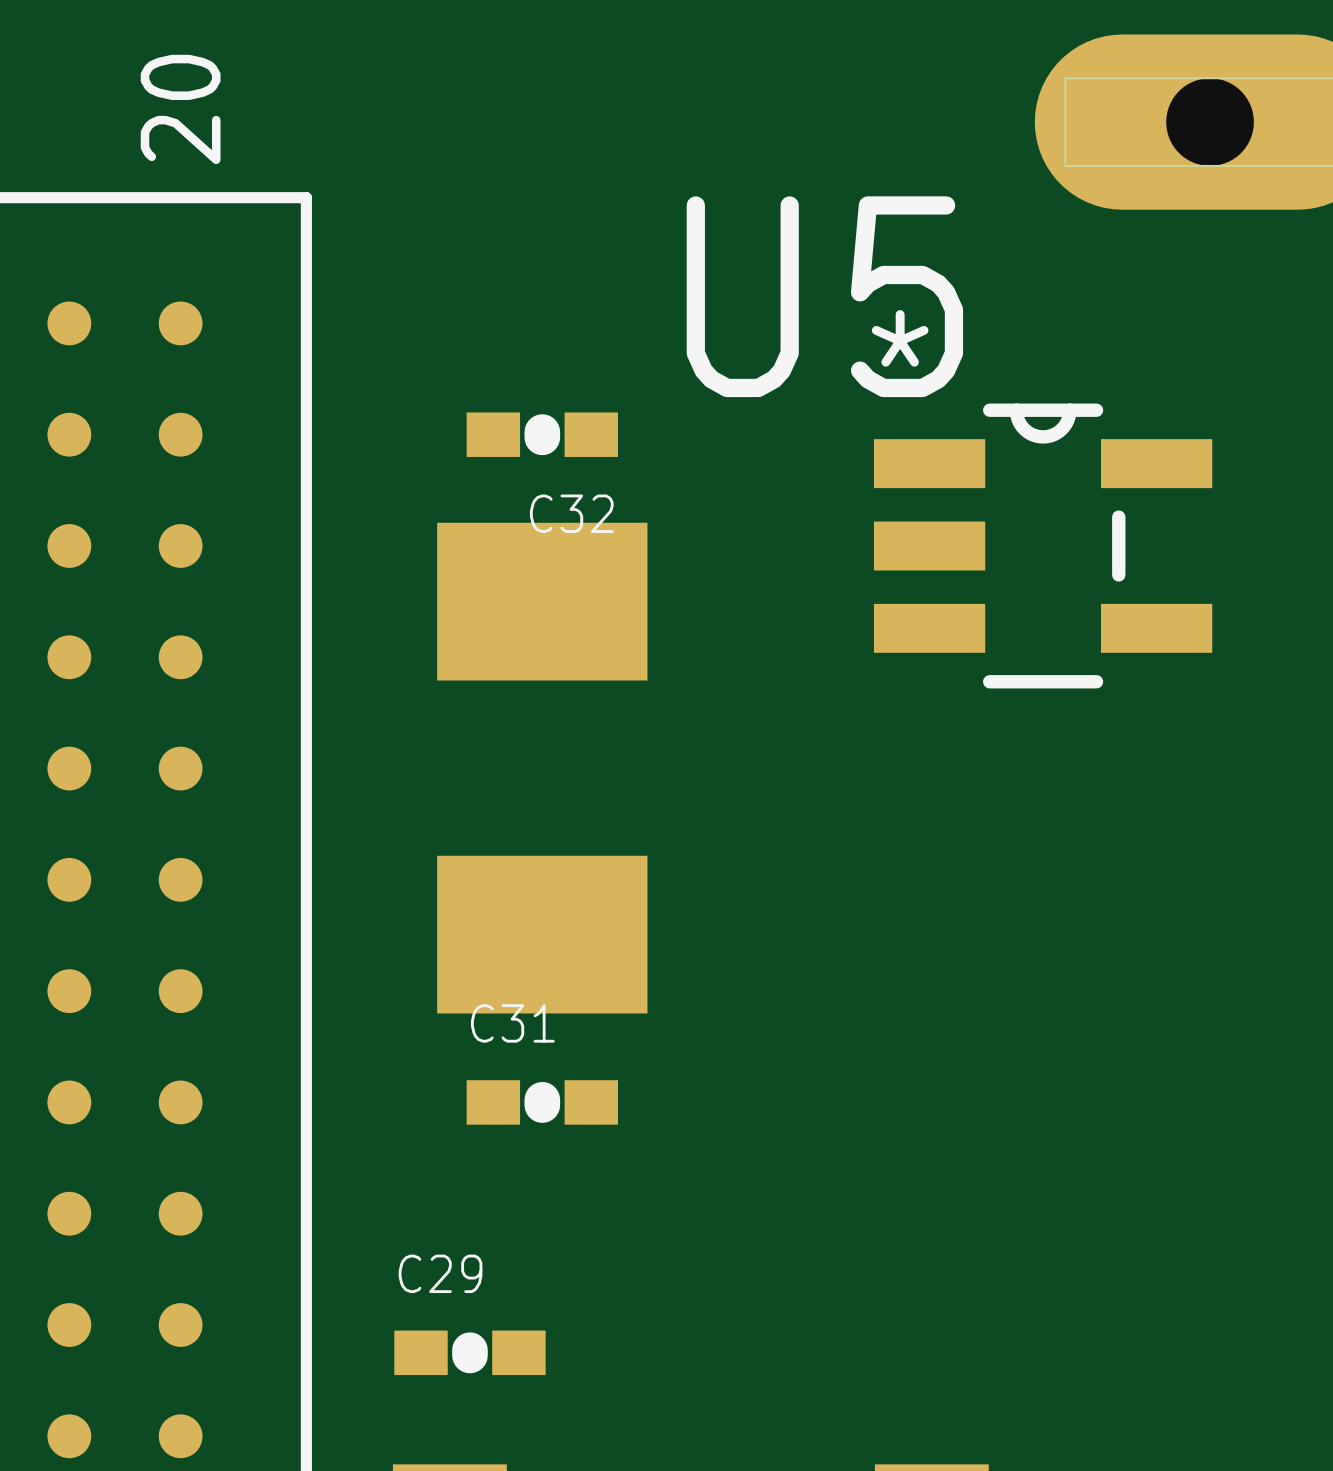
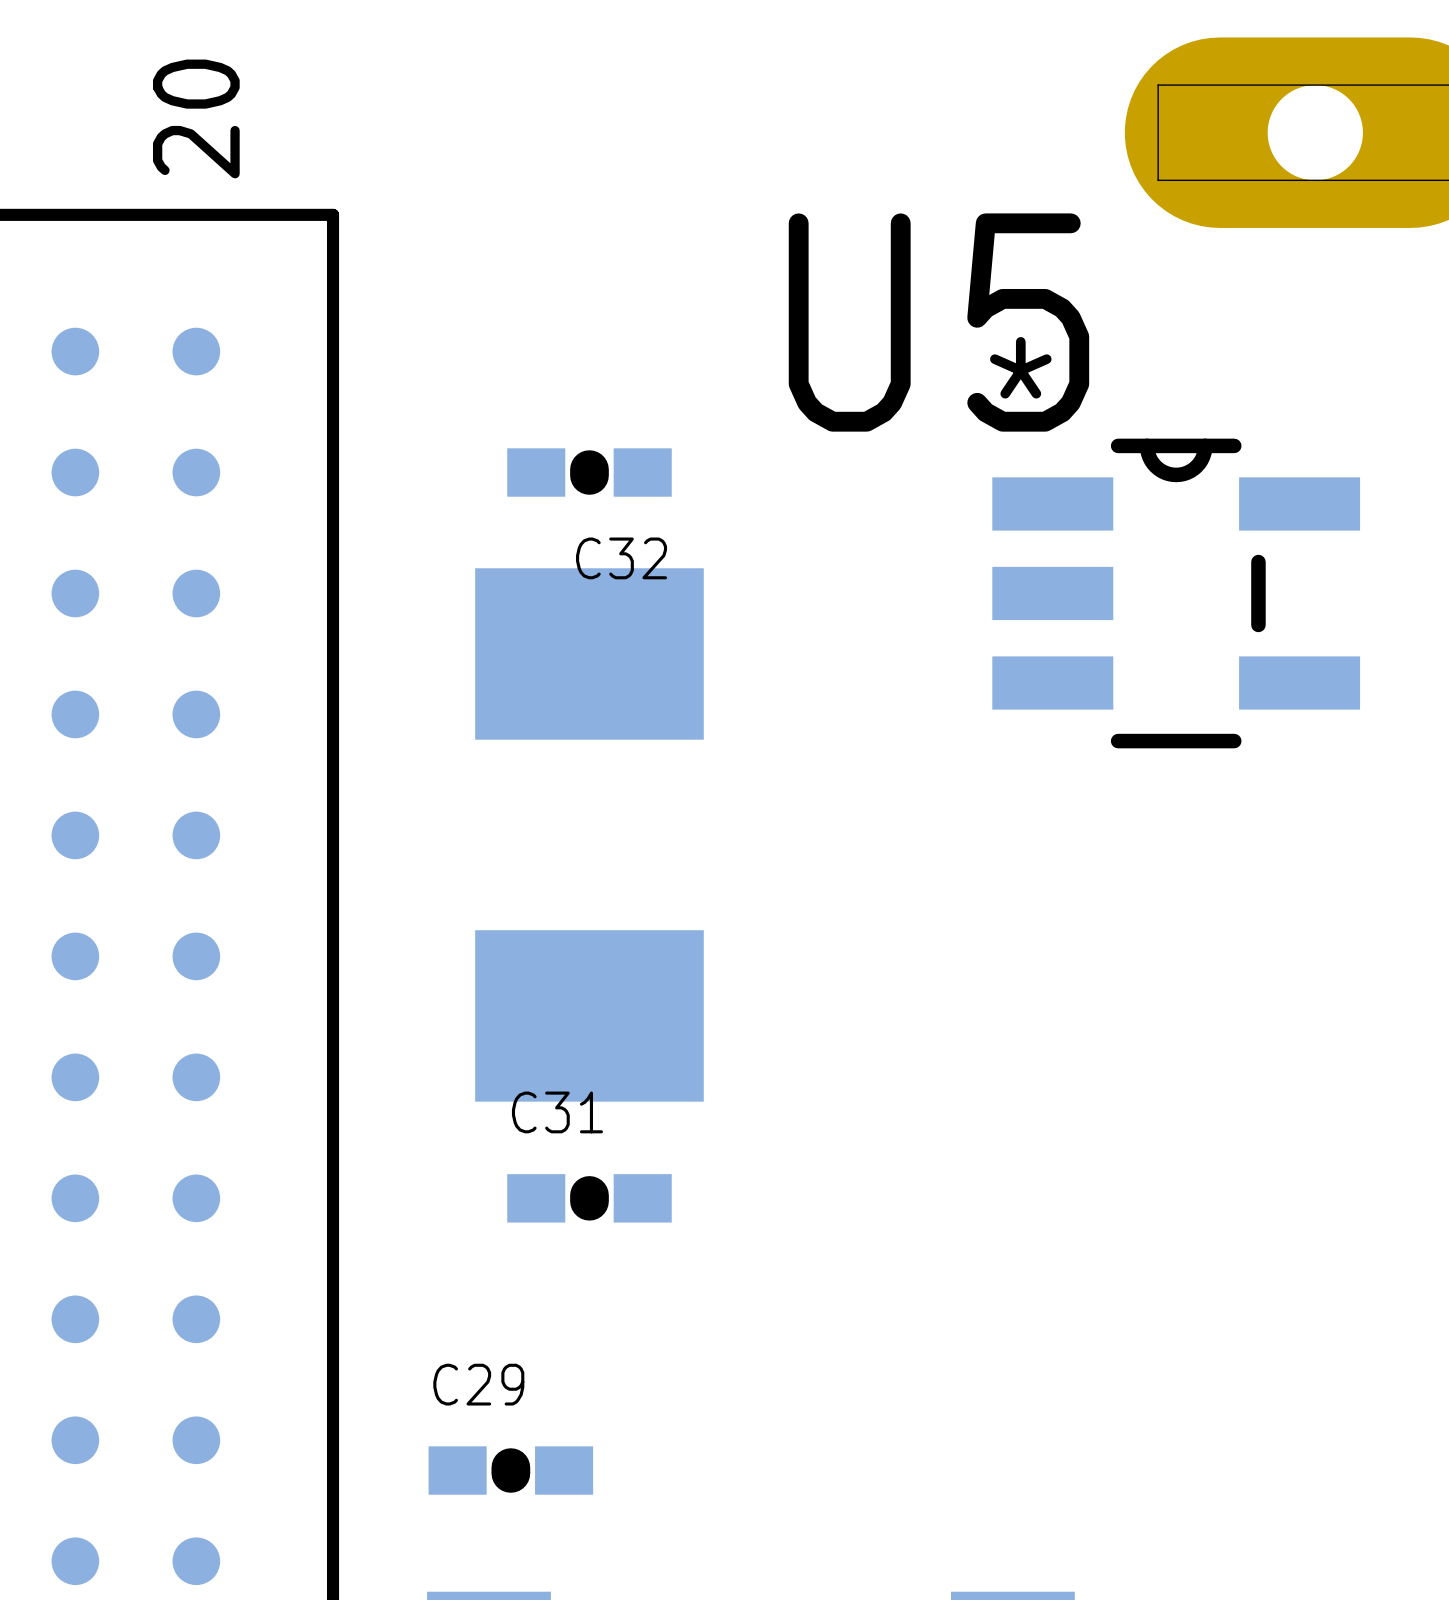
U5 position: (1043, 545) -> (1176, 593)

